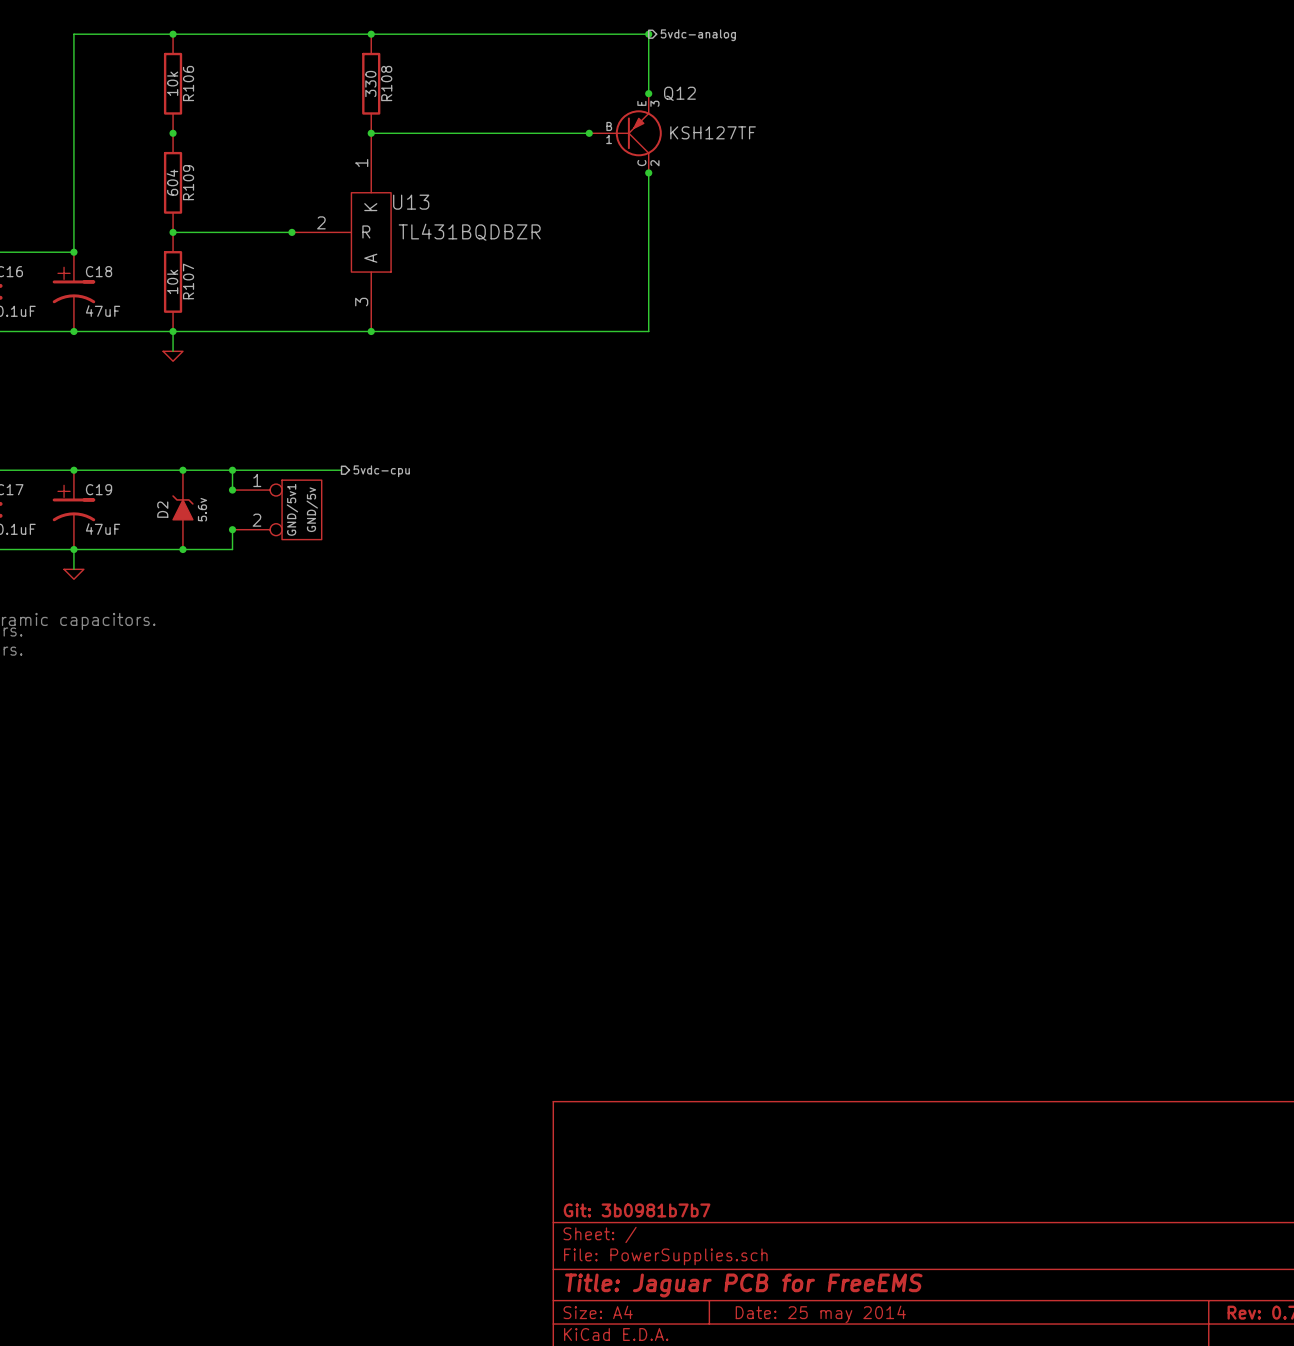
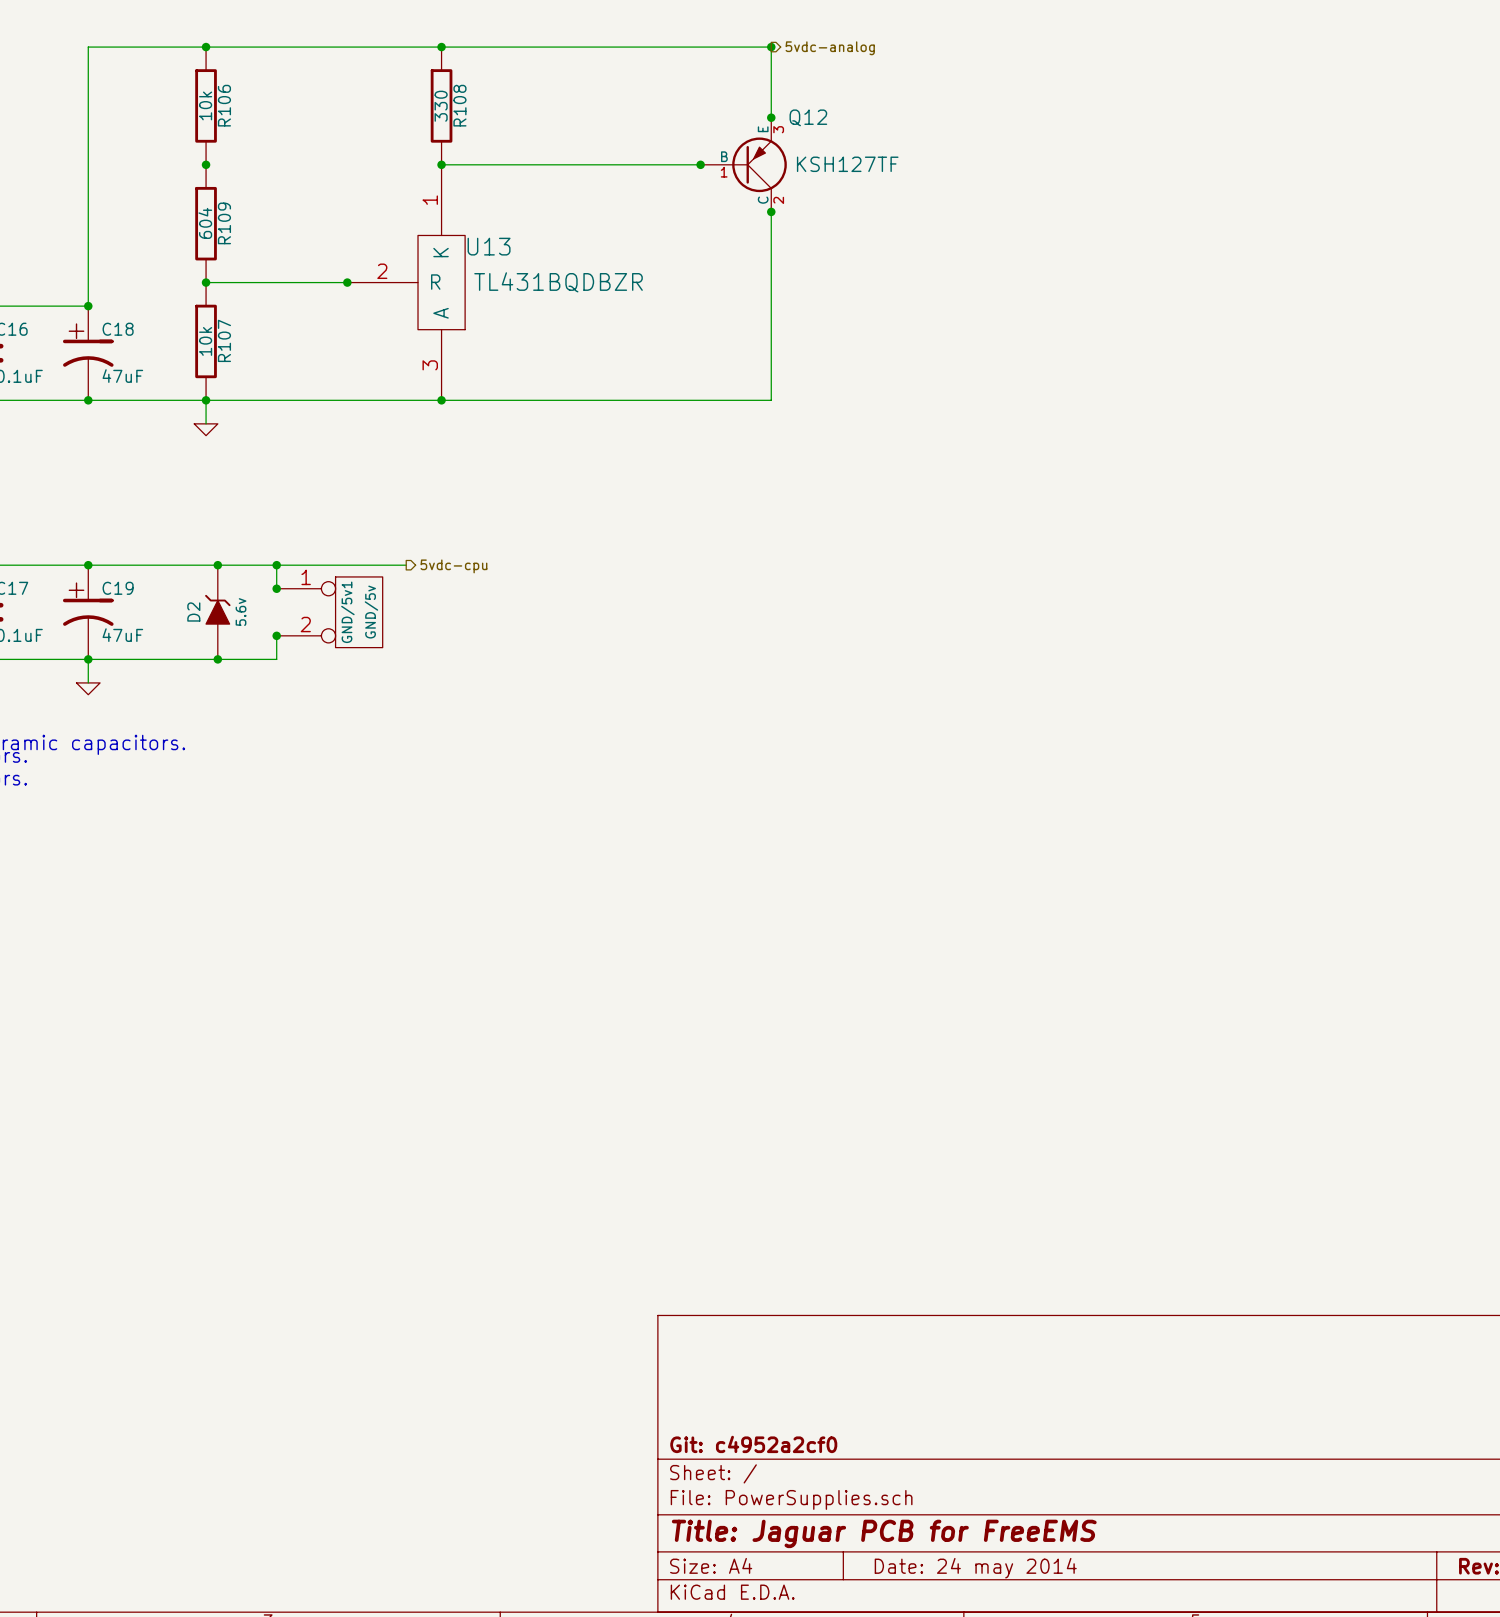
title block: Git: 3b0981b7b7 (637, 1210) -> Git: c4952a2cf0 (753, 1444)
title block: Date: 25 may 2014 (820, 1314) -> Date: 24 may 2014 (975, 1568)

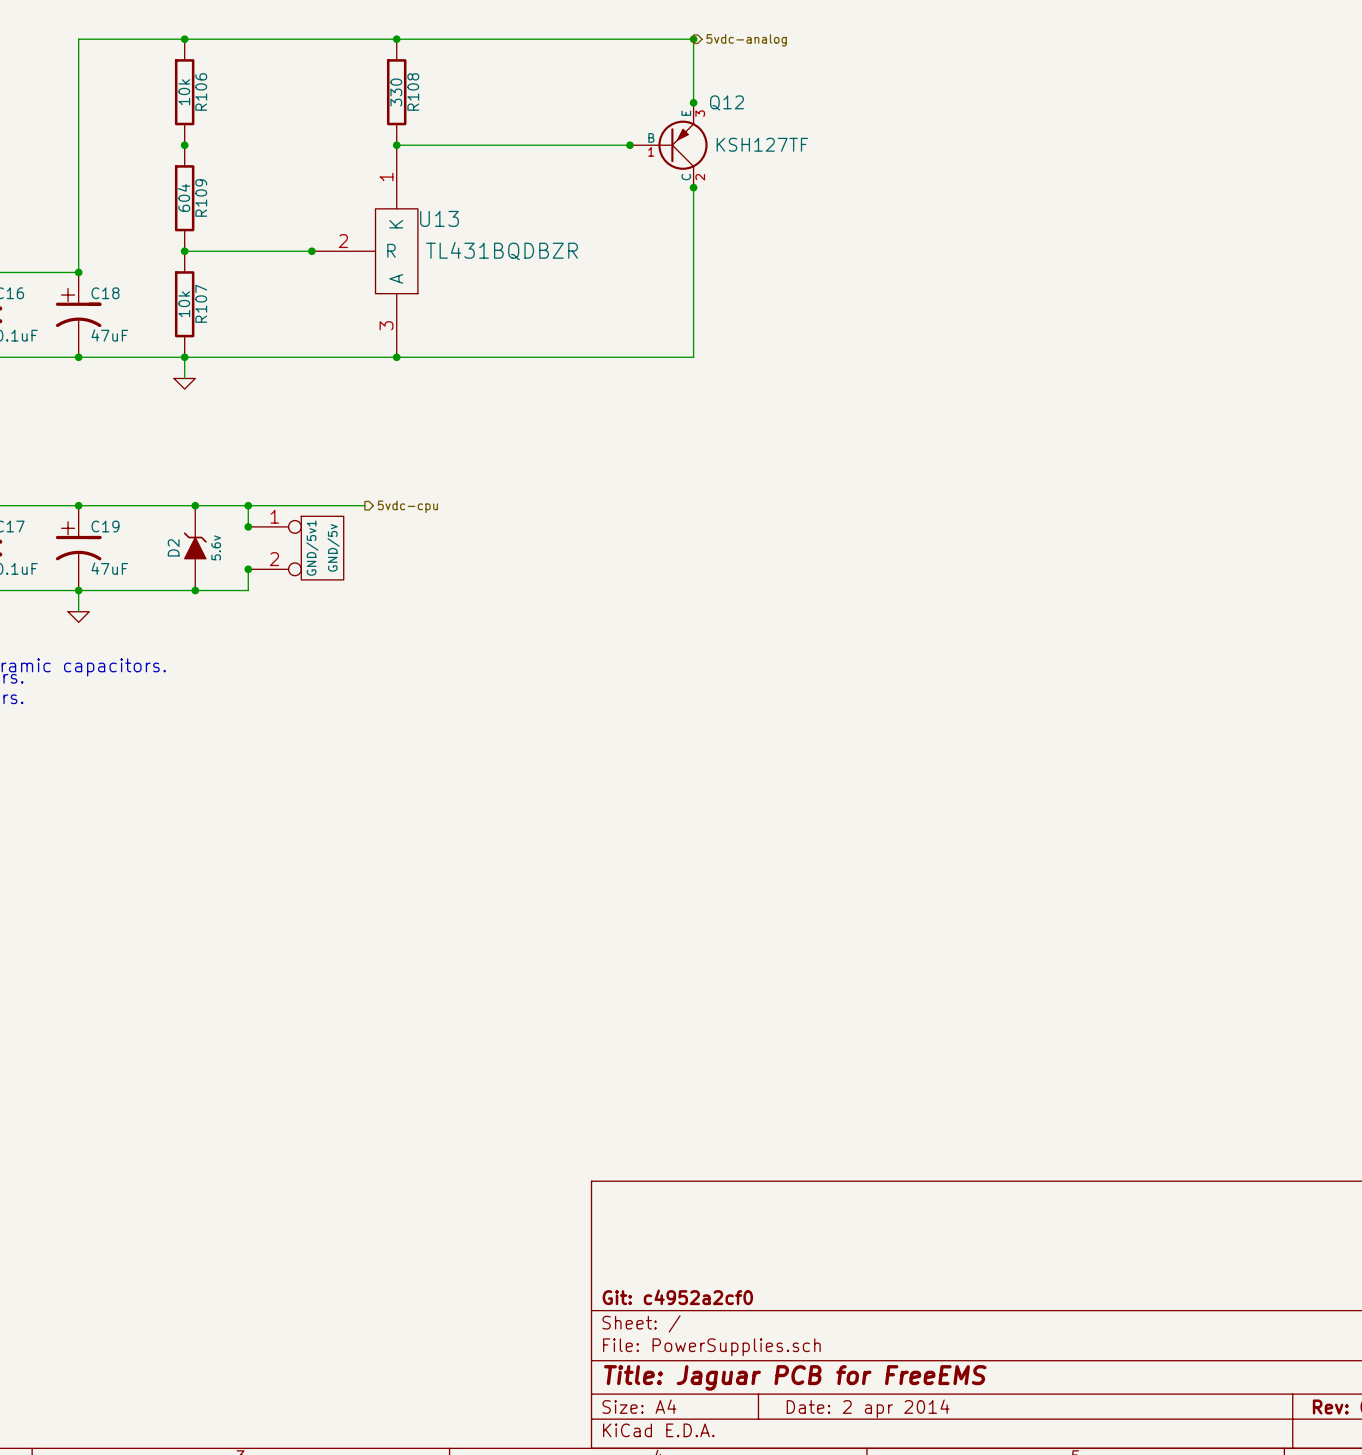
title block: Date: 24 may 2014 (975, 1568) -> Date: 2 apr 2014 (868, 1408)

